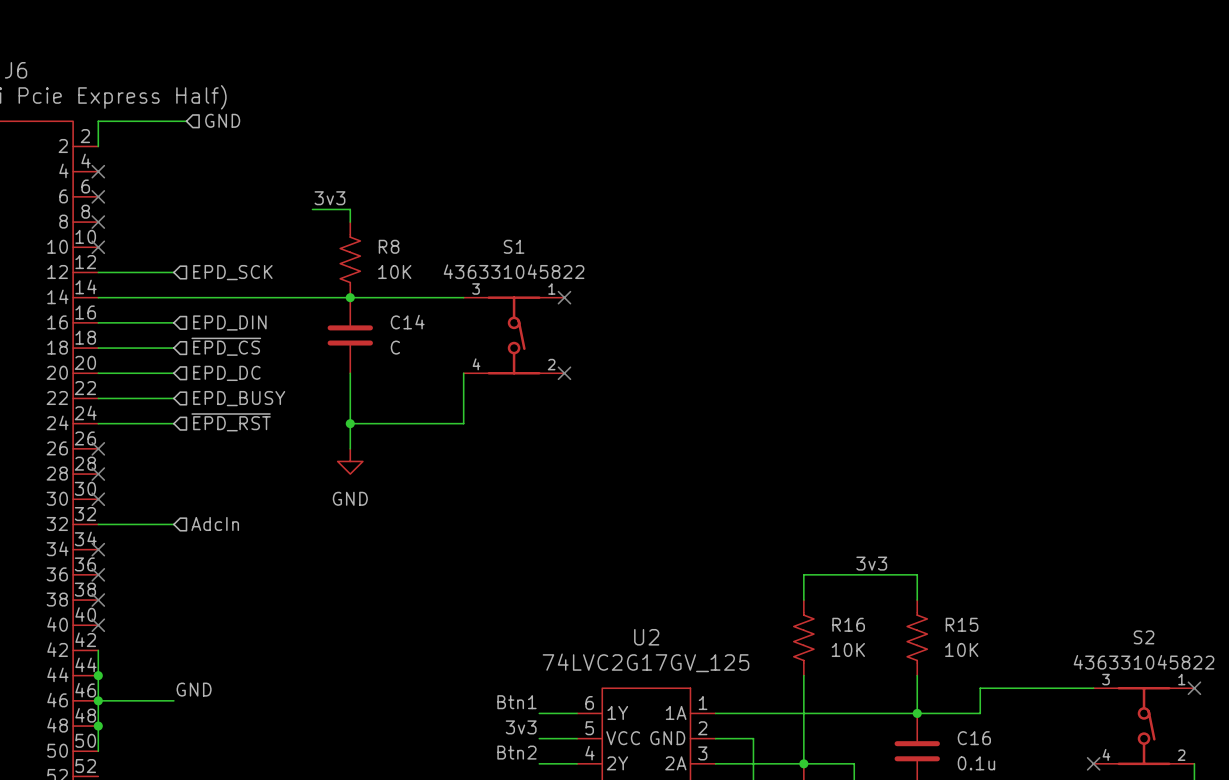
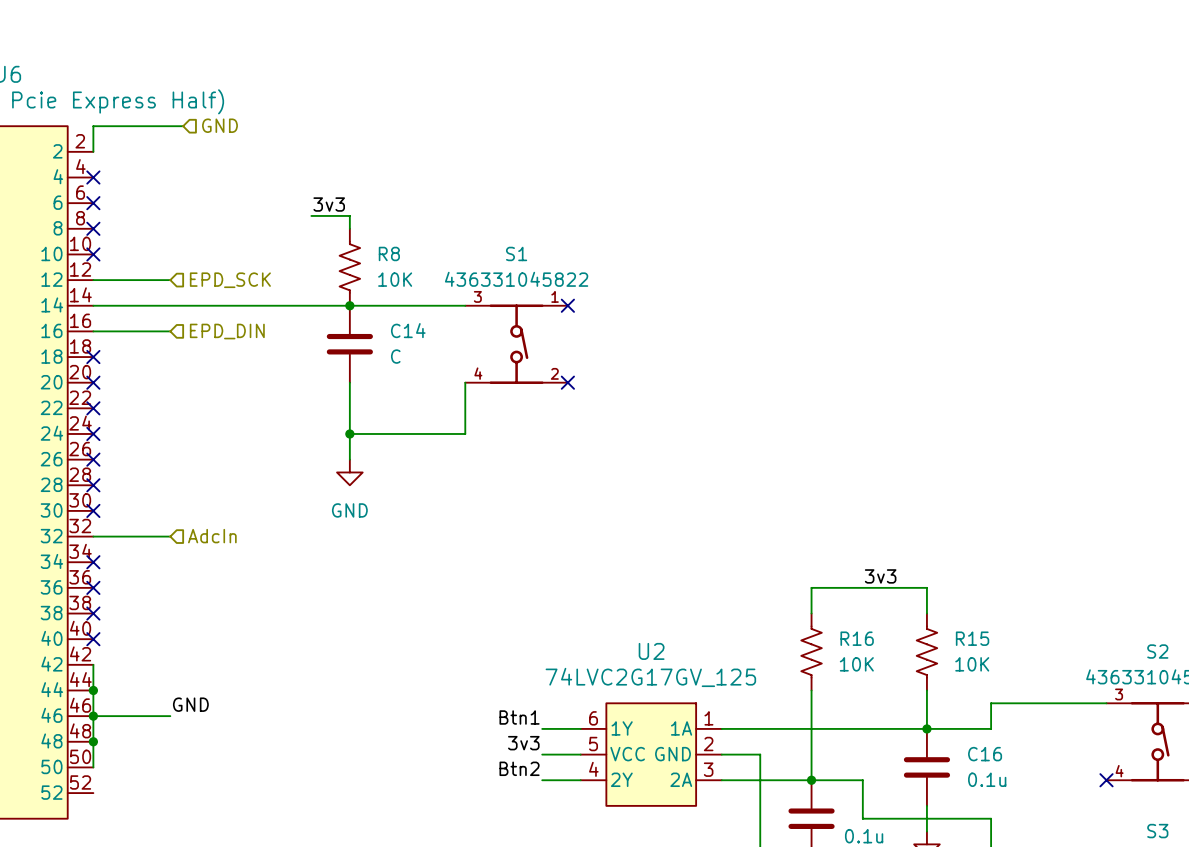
hierarchical label: ~{EPD_CS} (226, 346) -> none
wire: (98, 348) (173, 348) -> none
no-connect mark: none -> (93, 357)
wire: (98, 373) (173, 373) -> none
no-connect mark: none -> (93, 382)
hierarchical label: EPD_DC (226, 373) -> none
wire: (98, 398) (173, 398) -> none
no-connect mark: none -> (93, 408)
hierarchical label: EPD_BUSY (239, 398) -> none
hierarchical label: ~{EPD_RST} (231, 422) -> none
wire: (98, 423) (173, 423) -> none
no-connect mark: none -> (93, 433)

